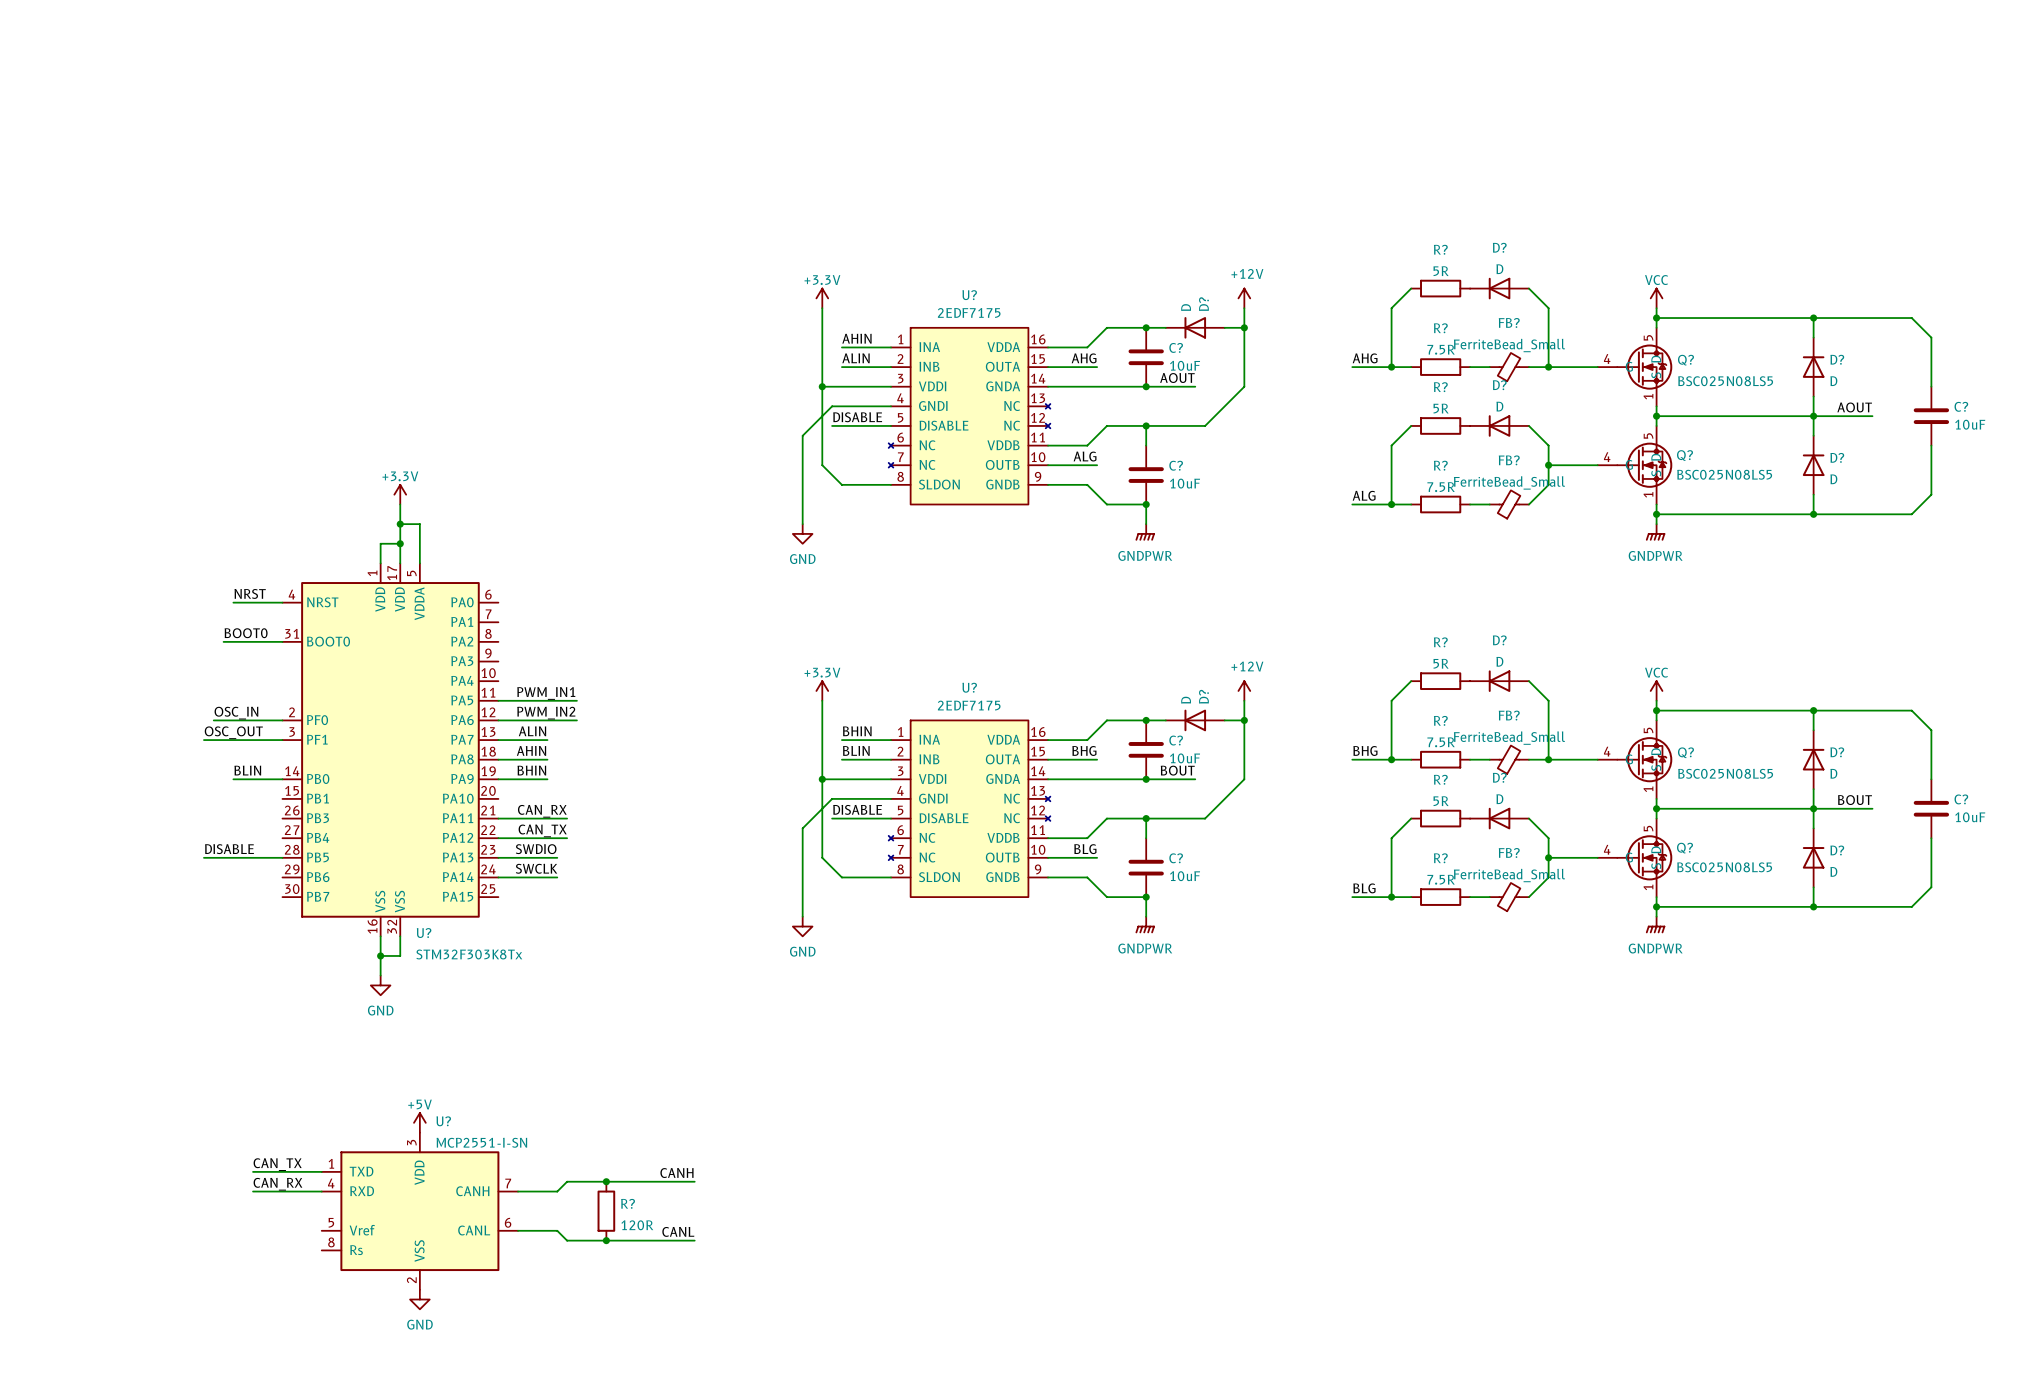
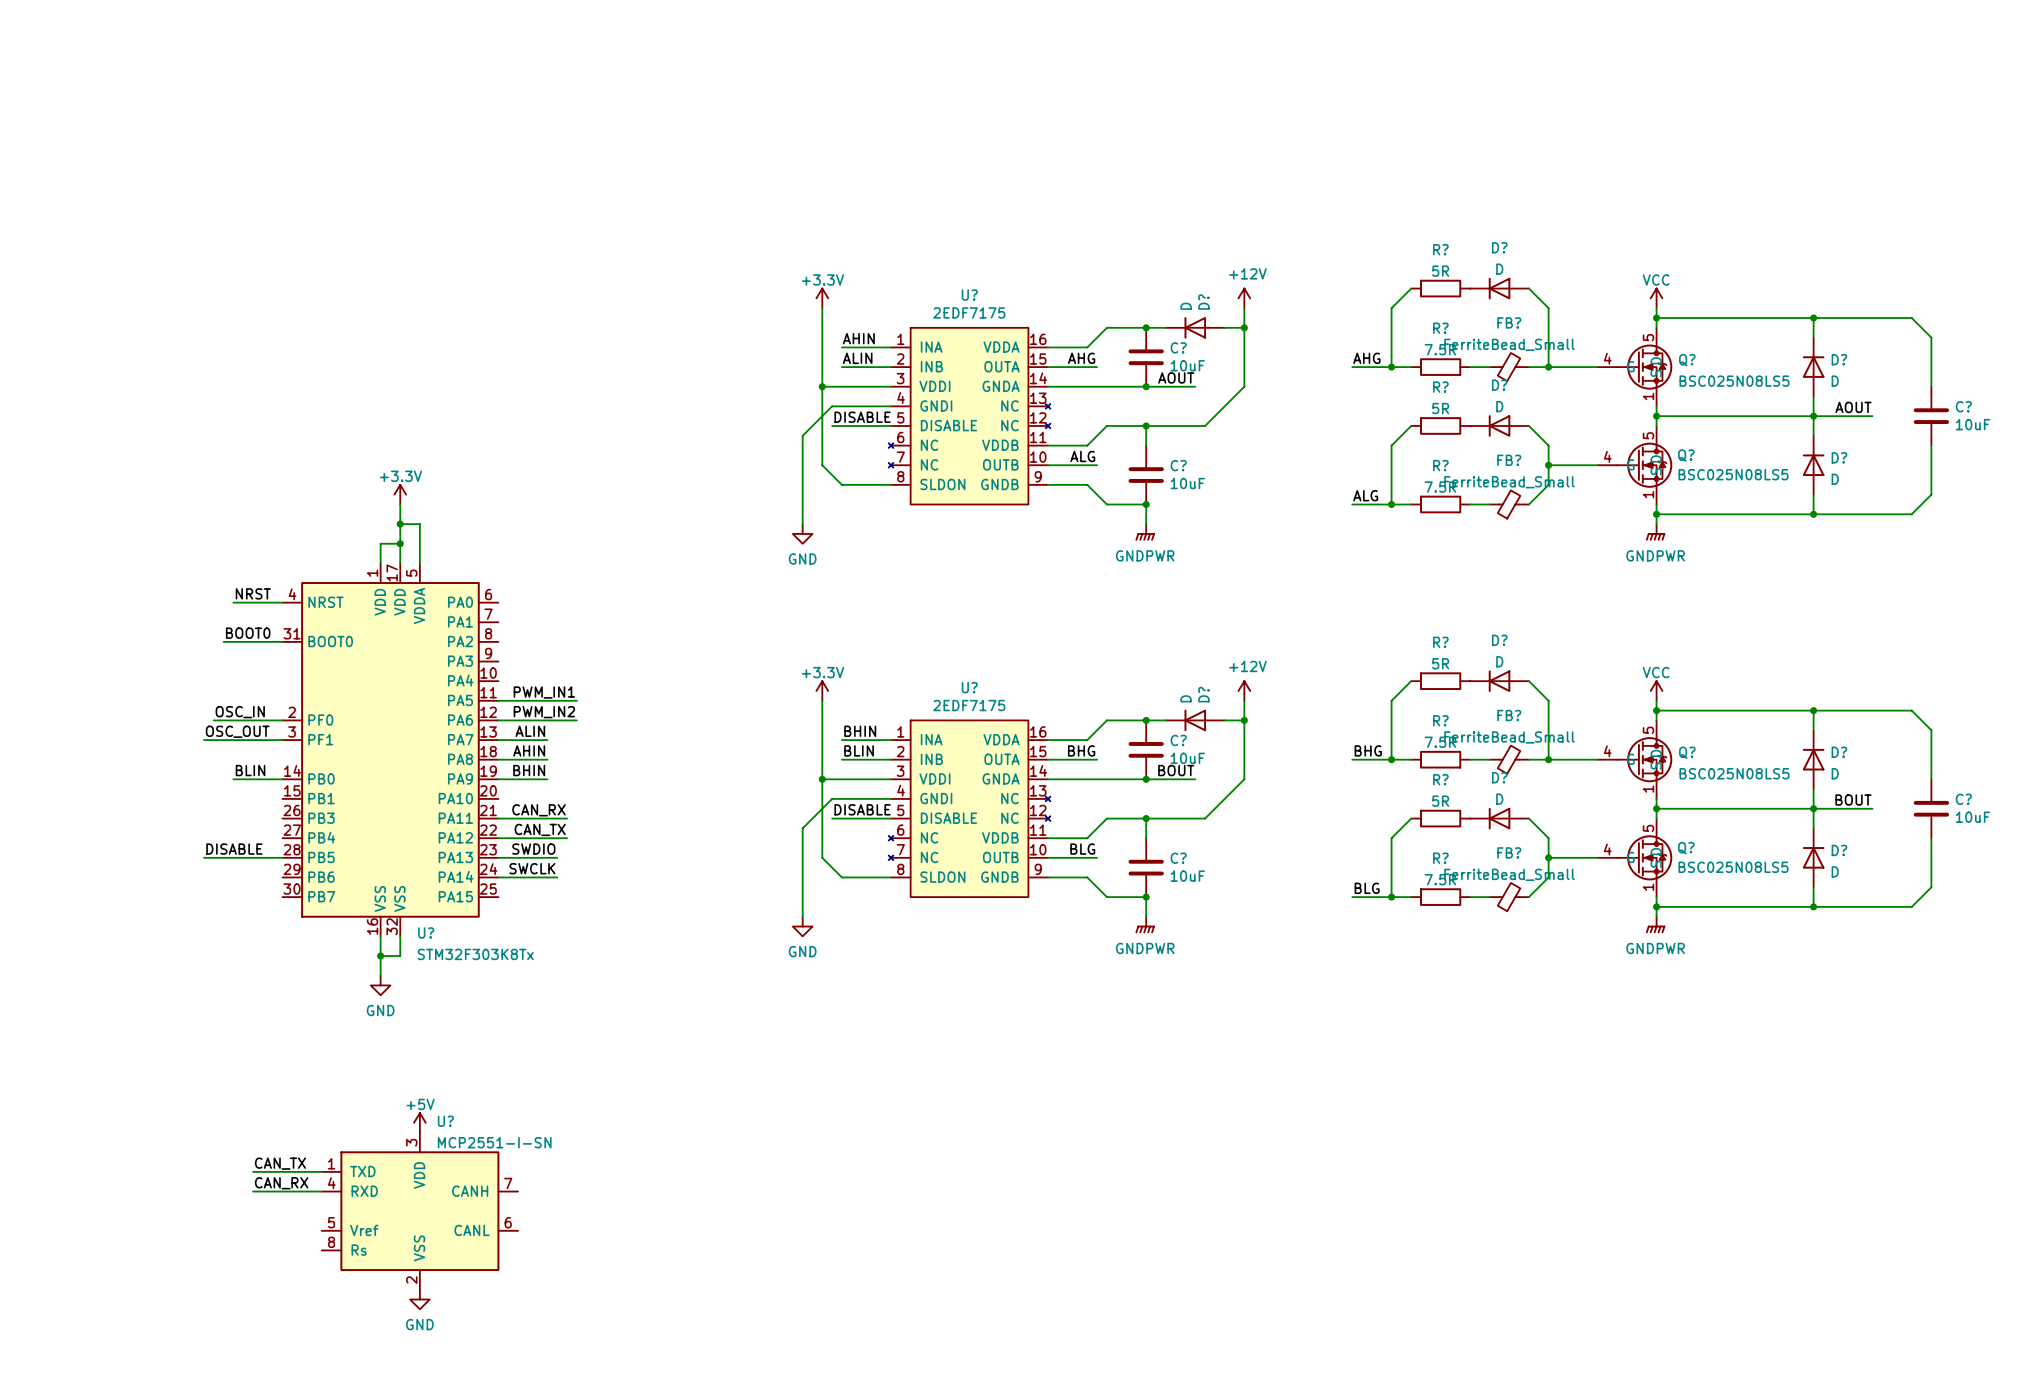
label: CANH (676, 1173) -> none
junction: (606, 1181) -> none
wire: (694, 1181) (567, 1181) (557, 1191) (518, 1191) -> none
R?: 120R (606, 1211) -> none
wire: (518, 1230) (557, 1230) (567, 1240) (694, 1240) -> none
label: CANL (678, 1231) -> none
junction: (606, 1240) -> none

